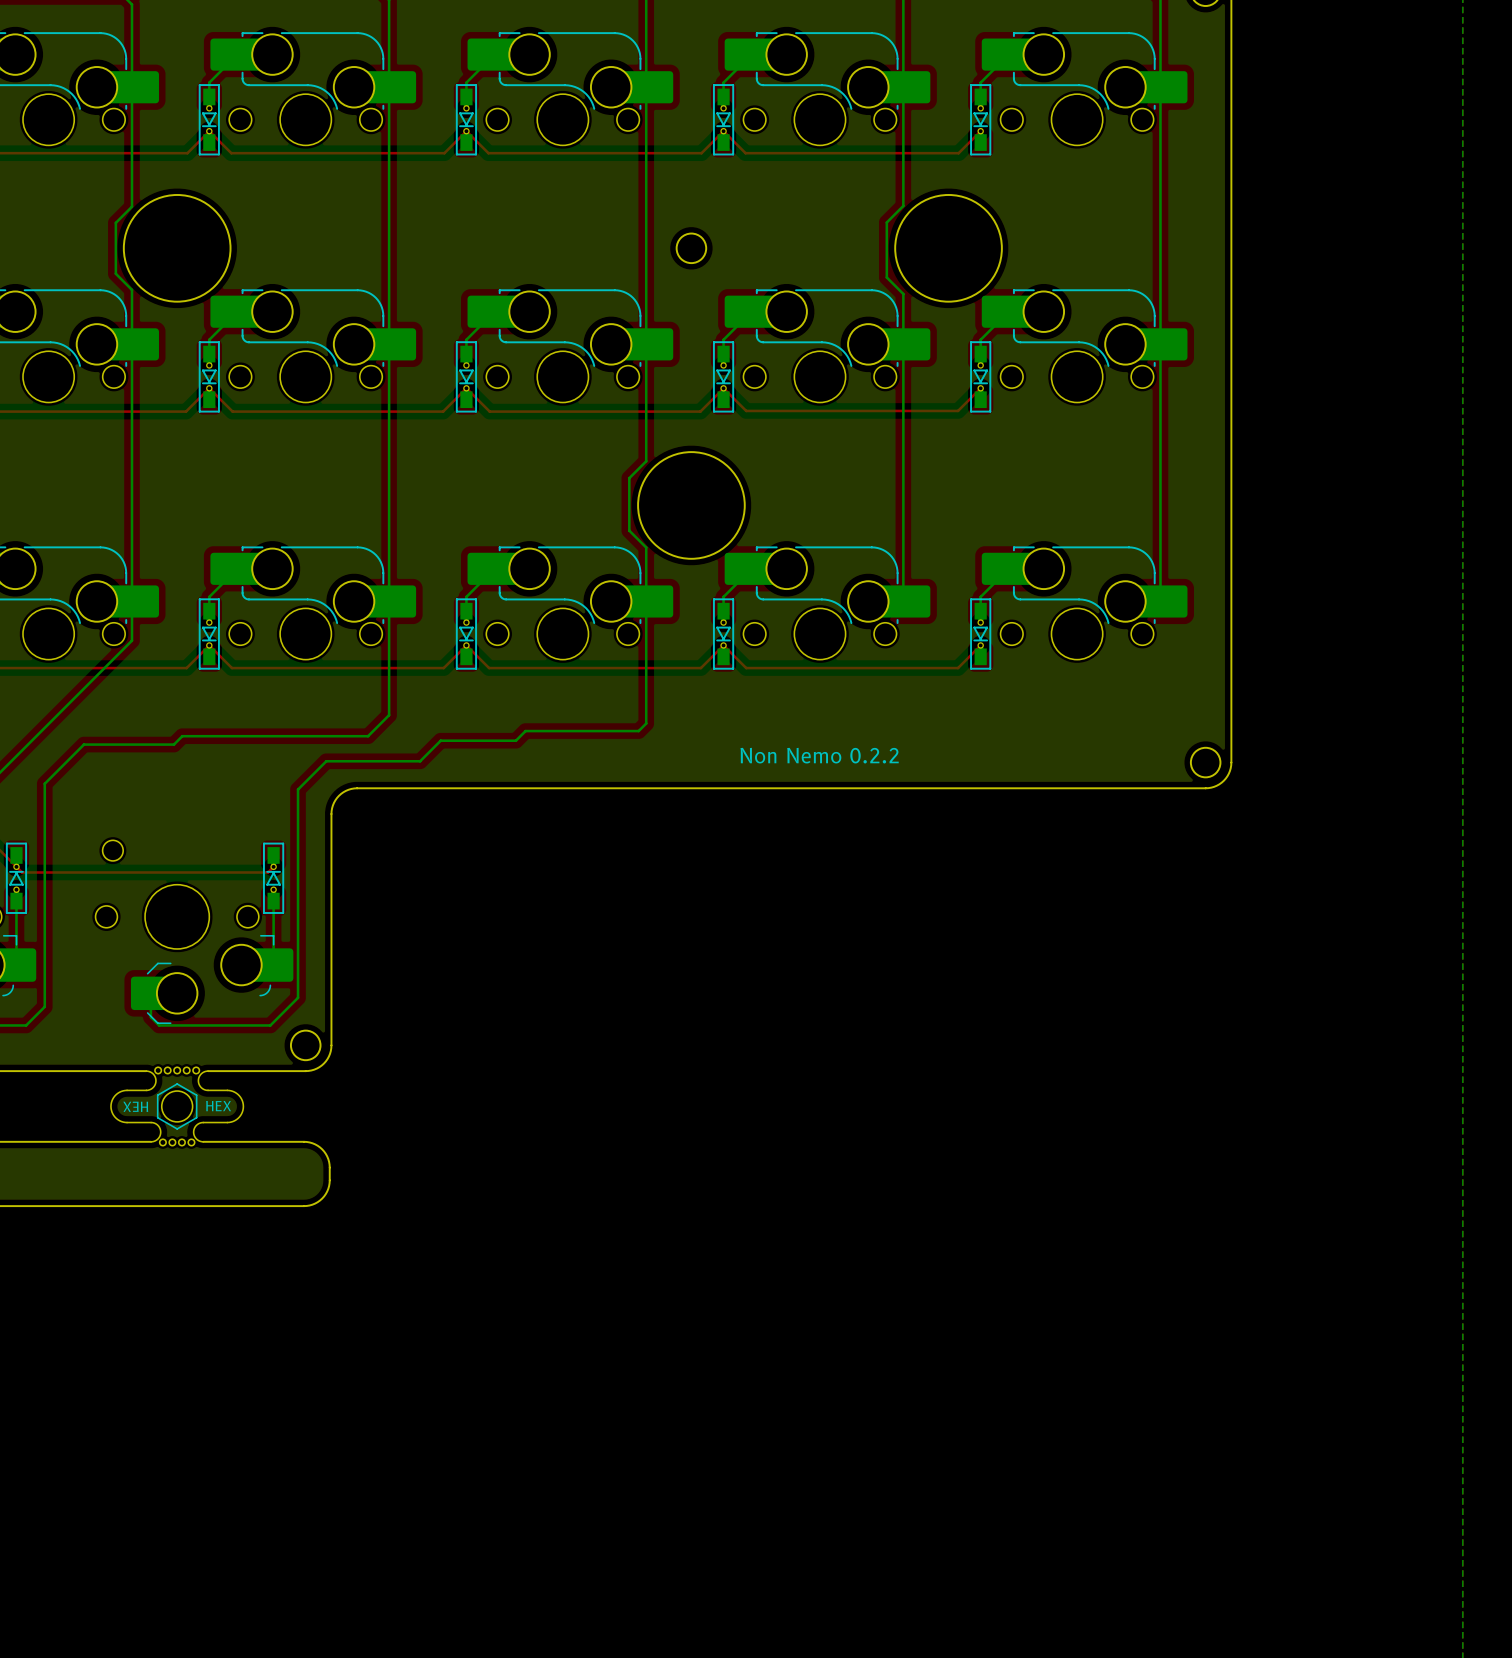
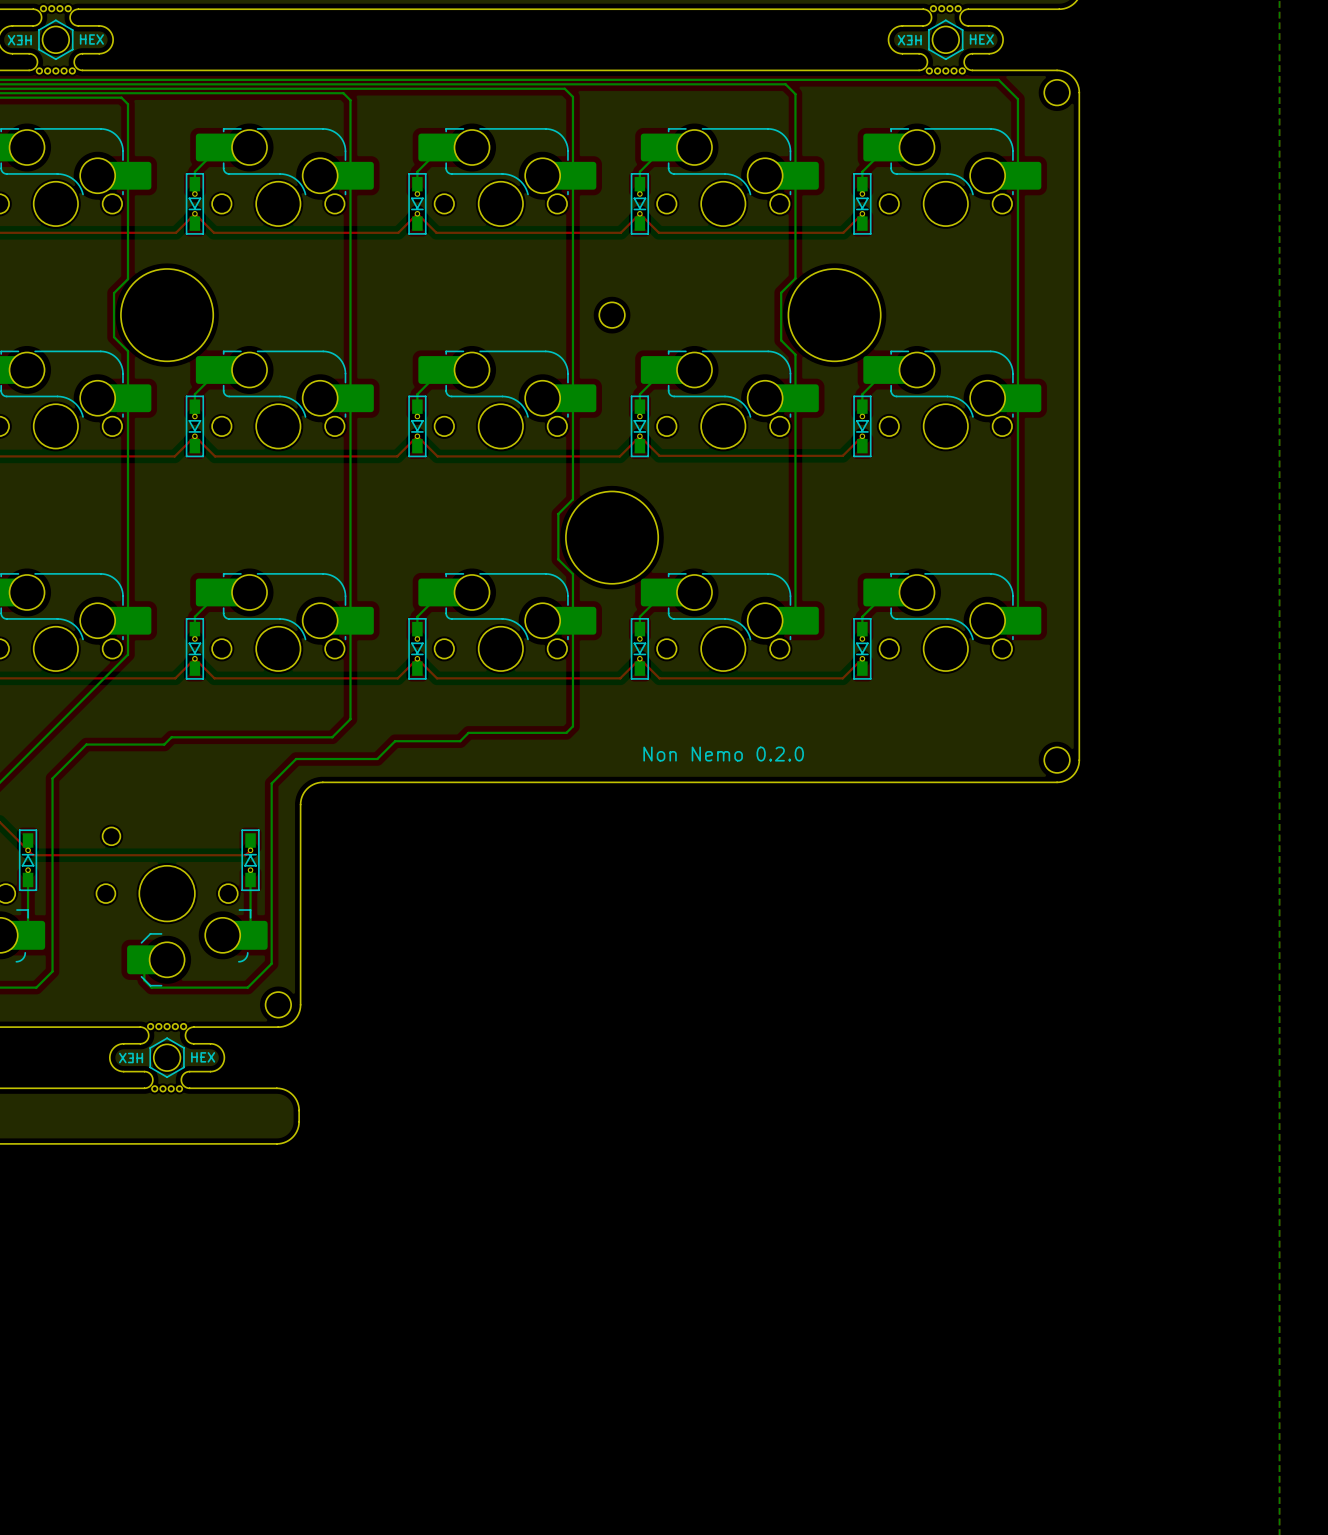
text: Non Nemo 0.2.2 (819, 755) -> Non Nemo 0.2.0 (723, 754)

